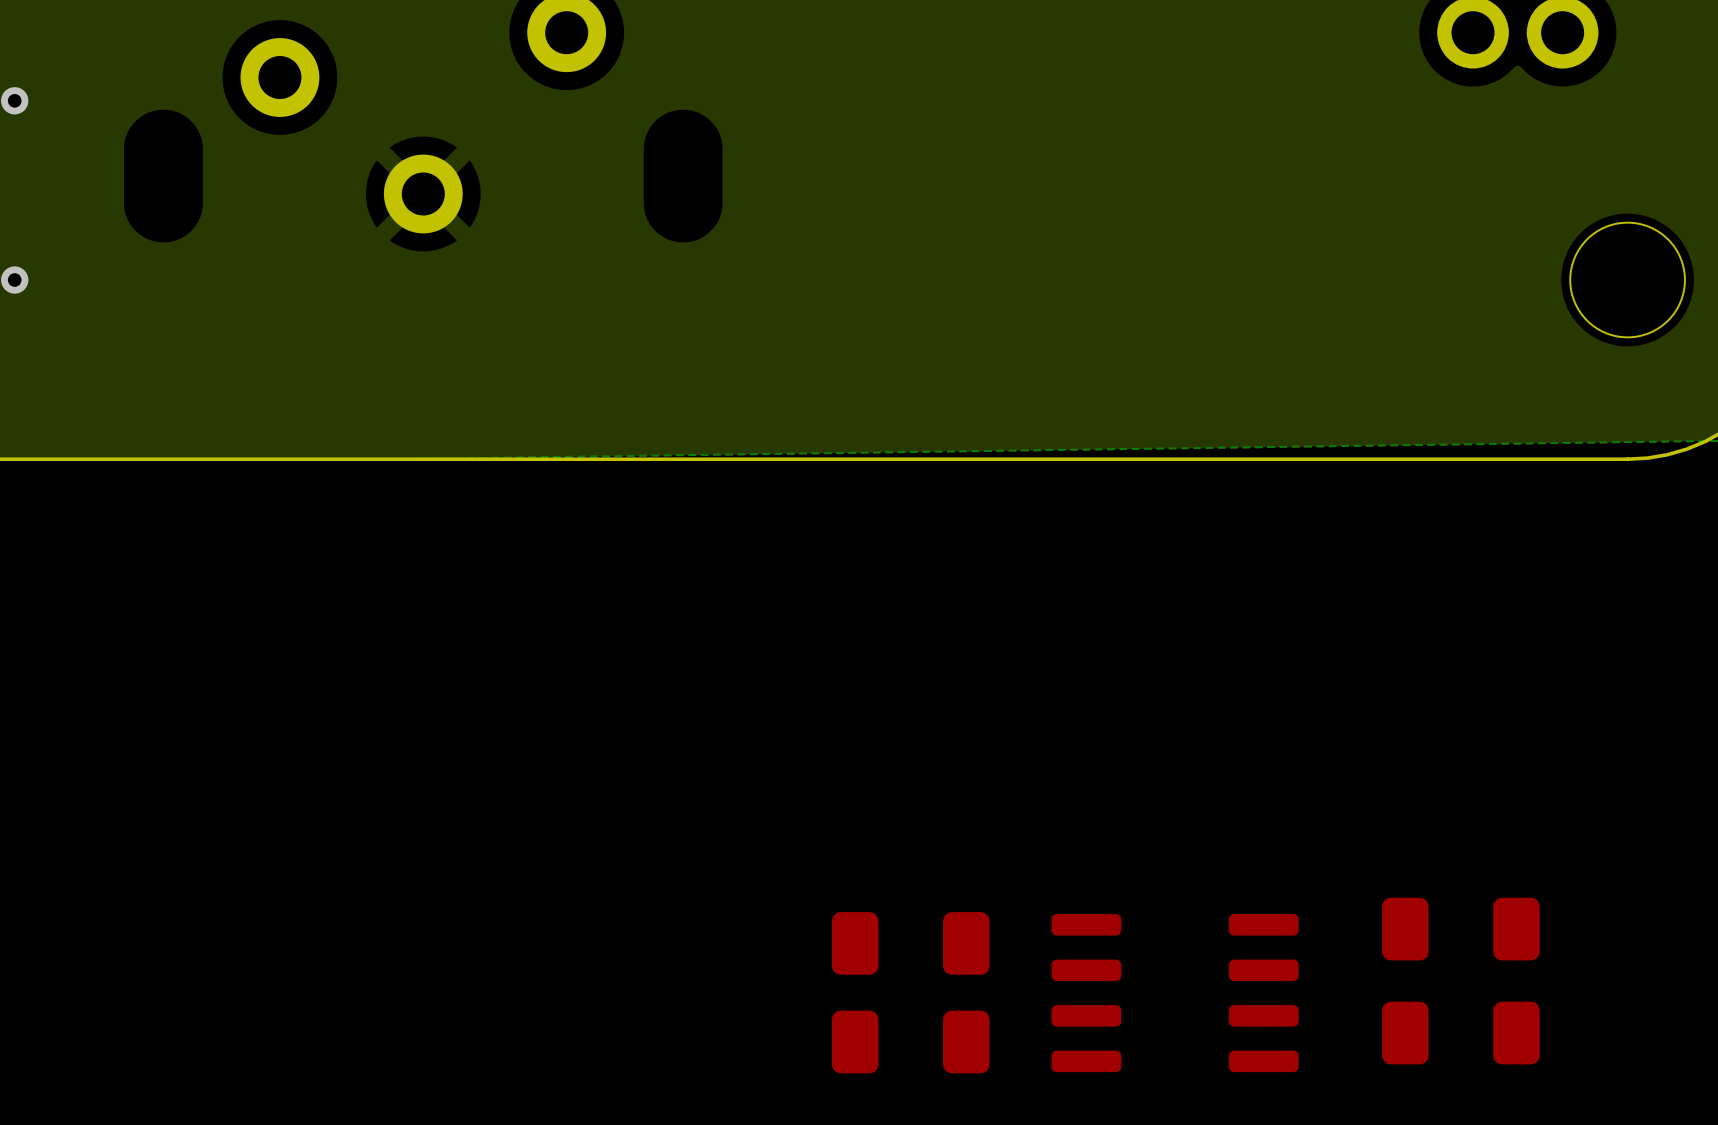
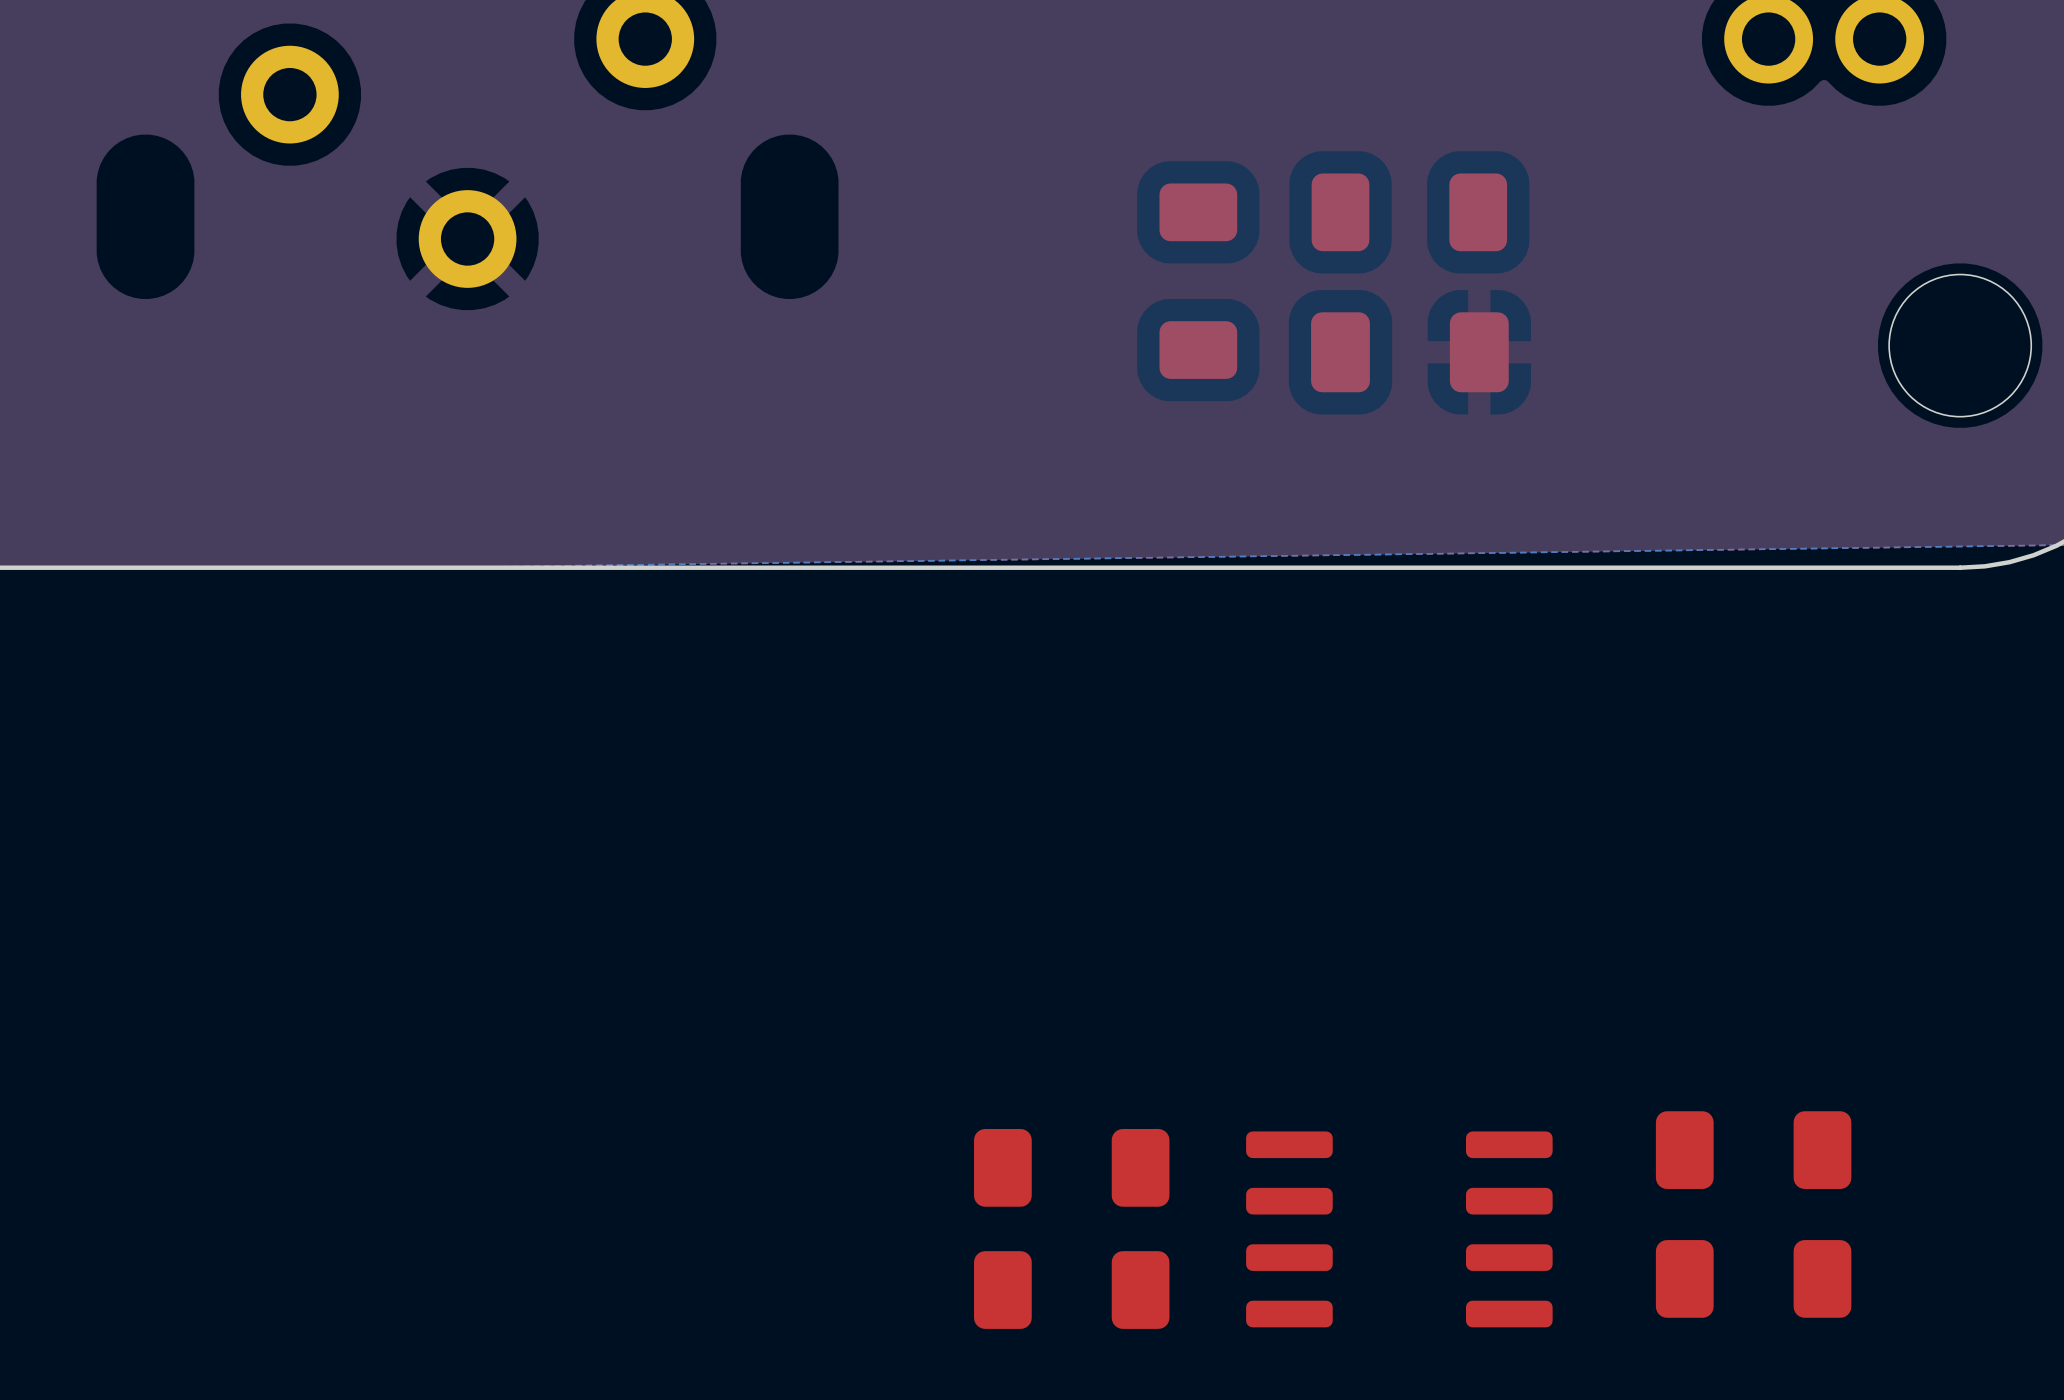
part: none -> (1409, 212)
part: none -> (1198, 281)
part: none -> (1409, 352)

